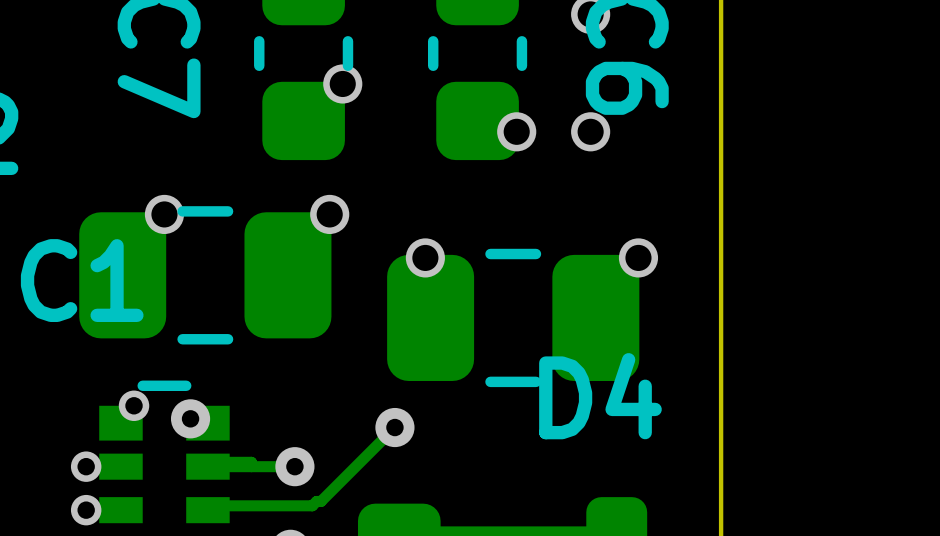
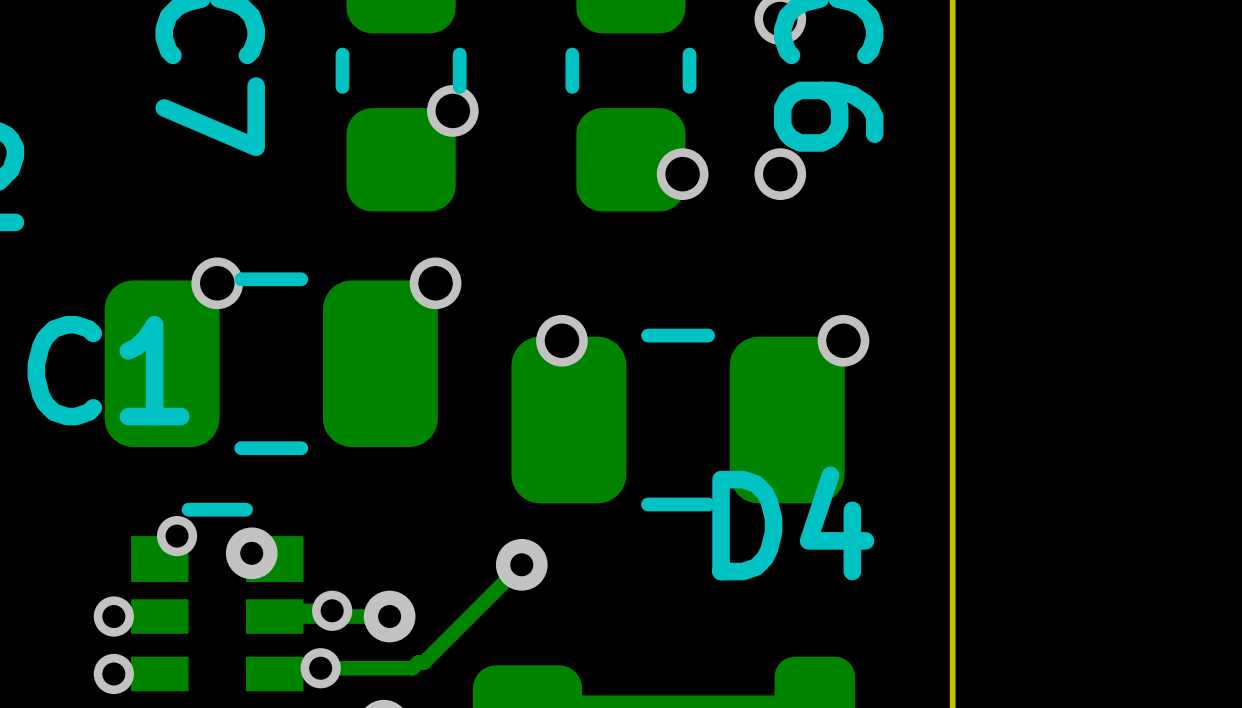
via: none -> (332, 610)
via: none -> (320, 668)

